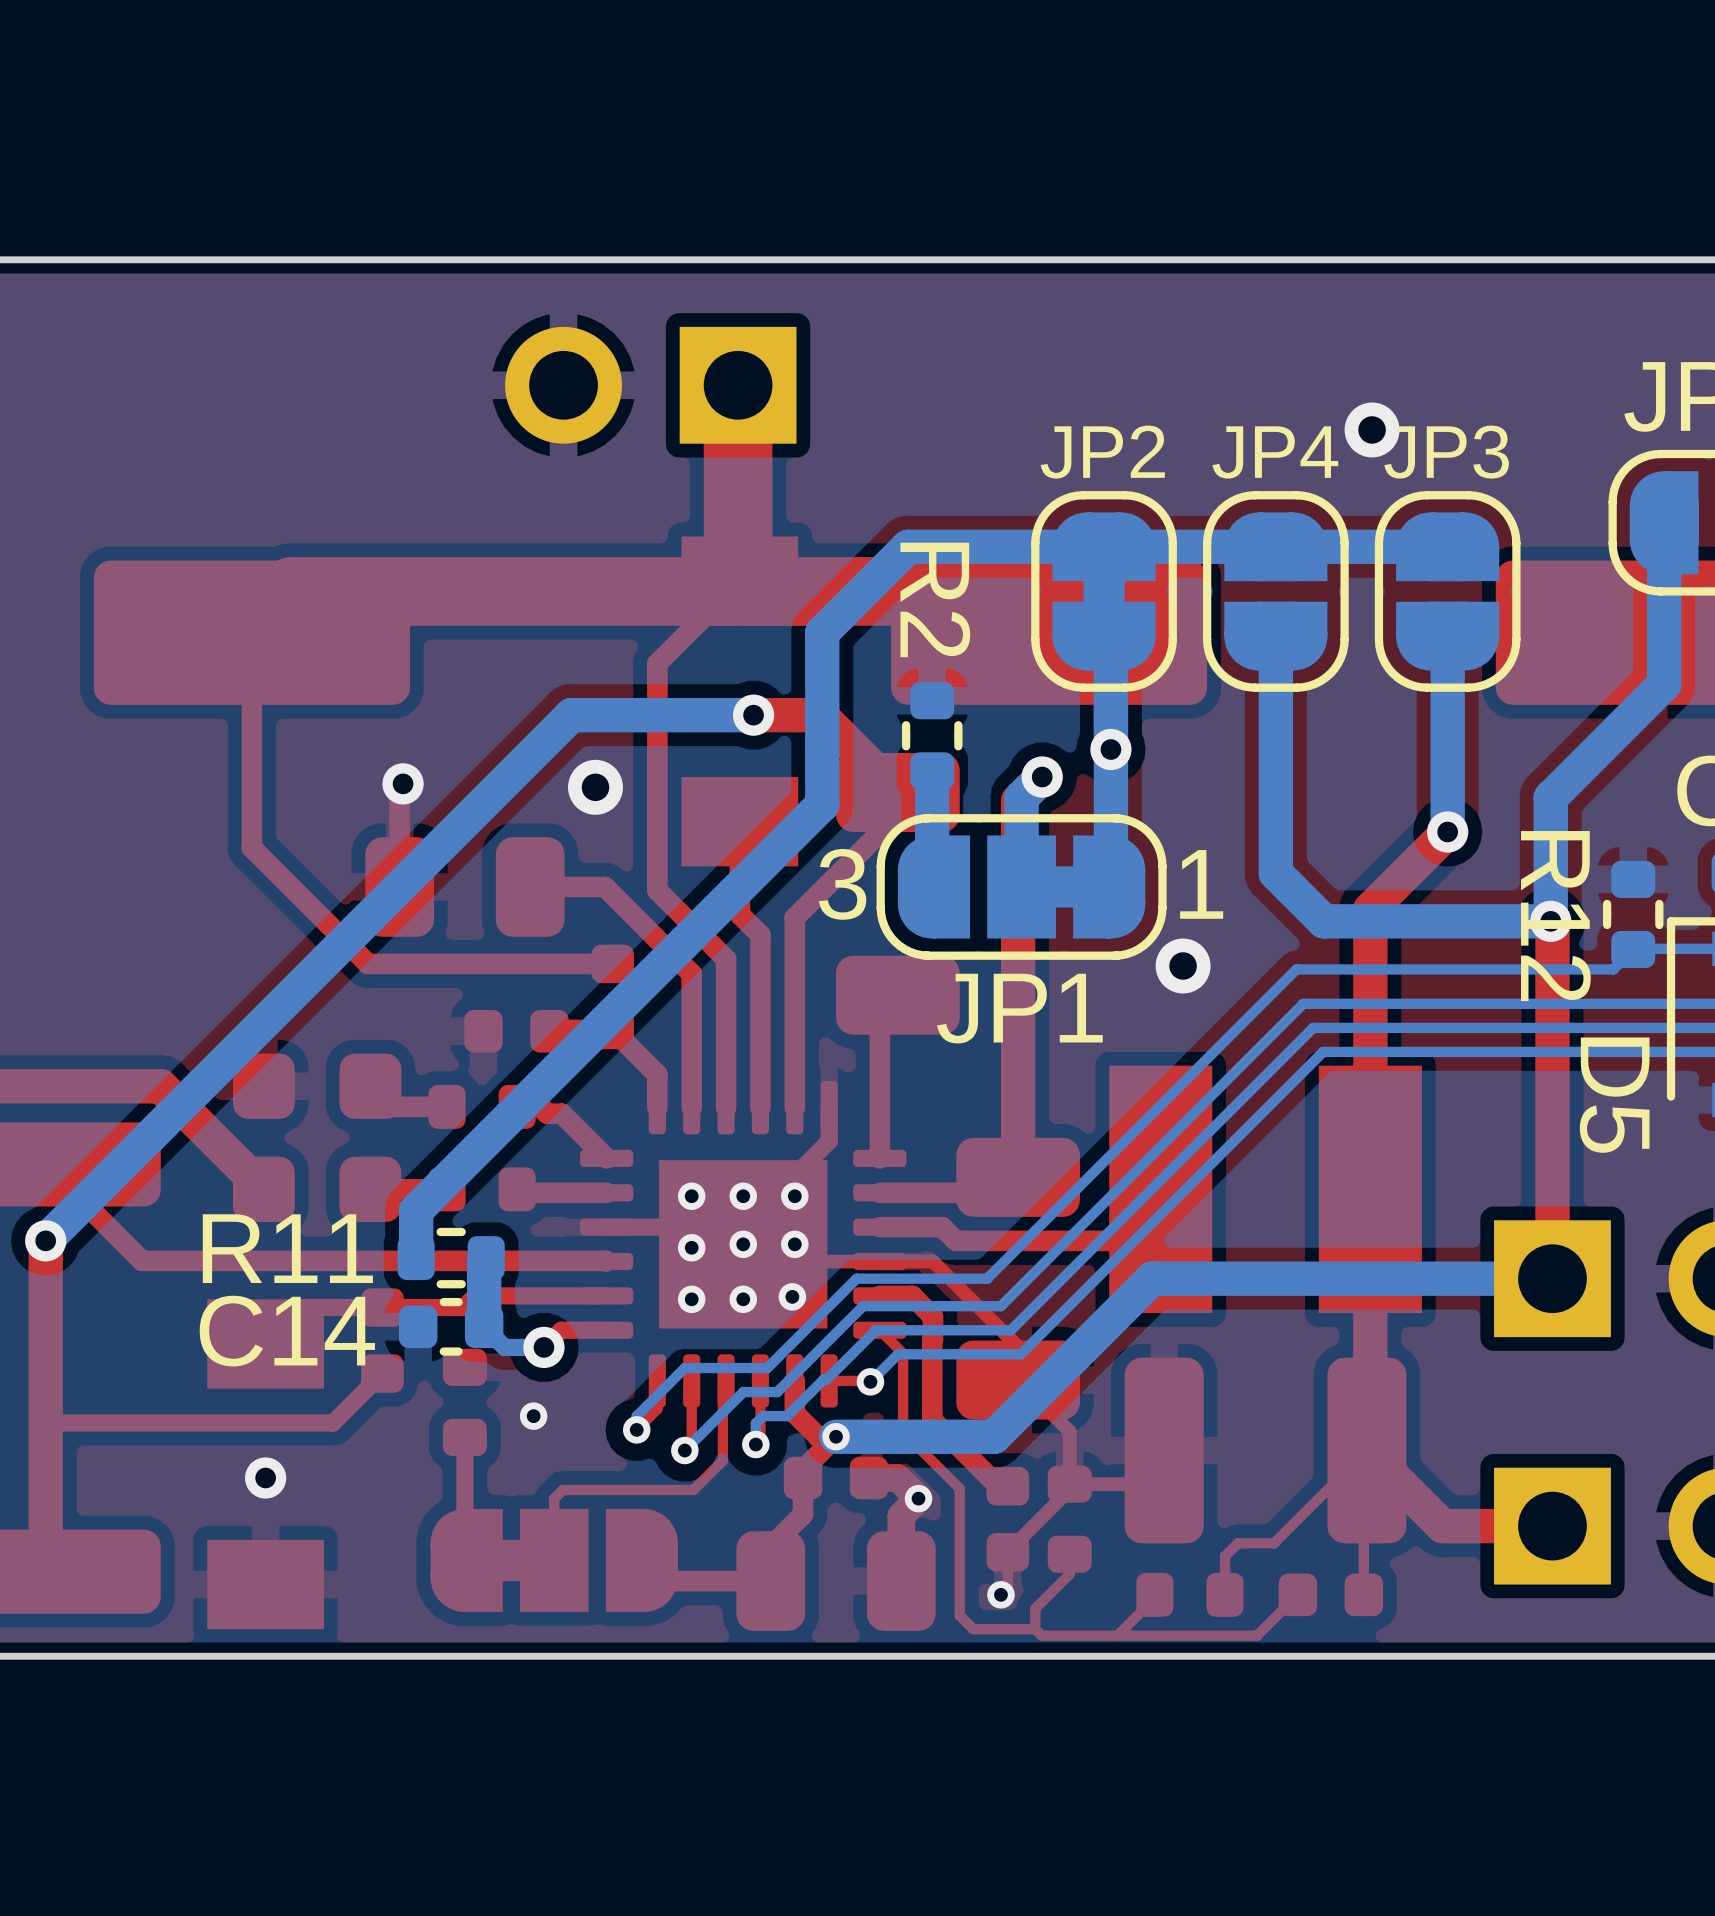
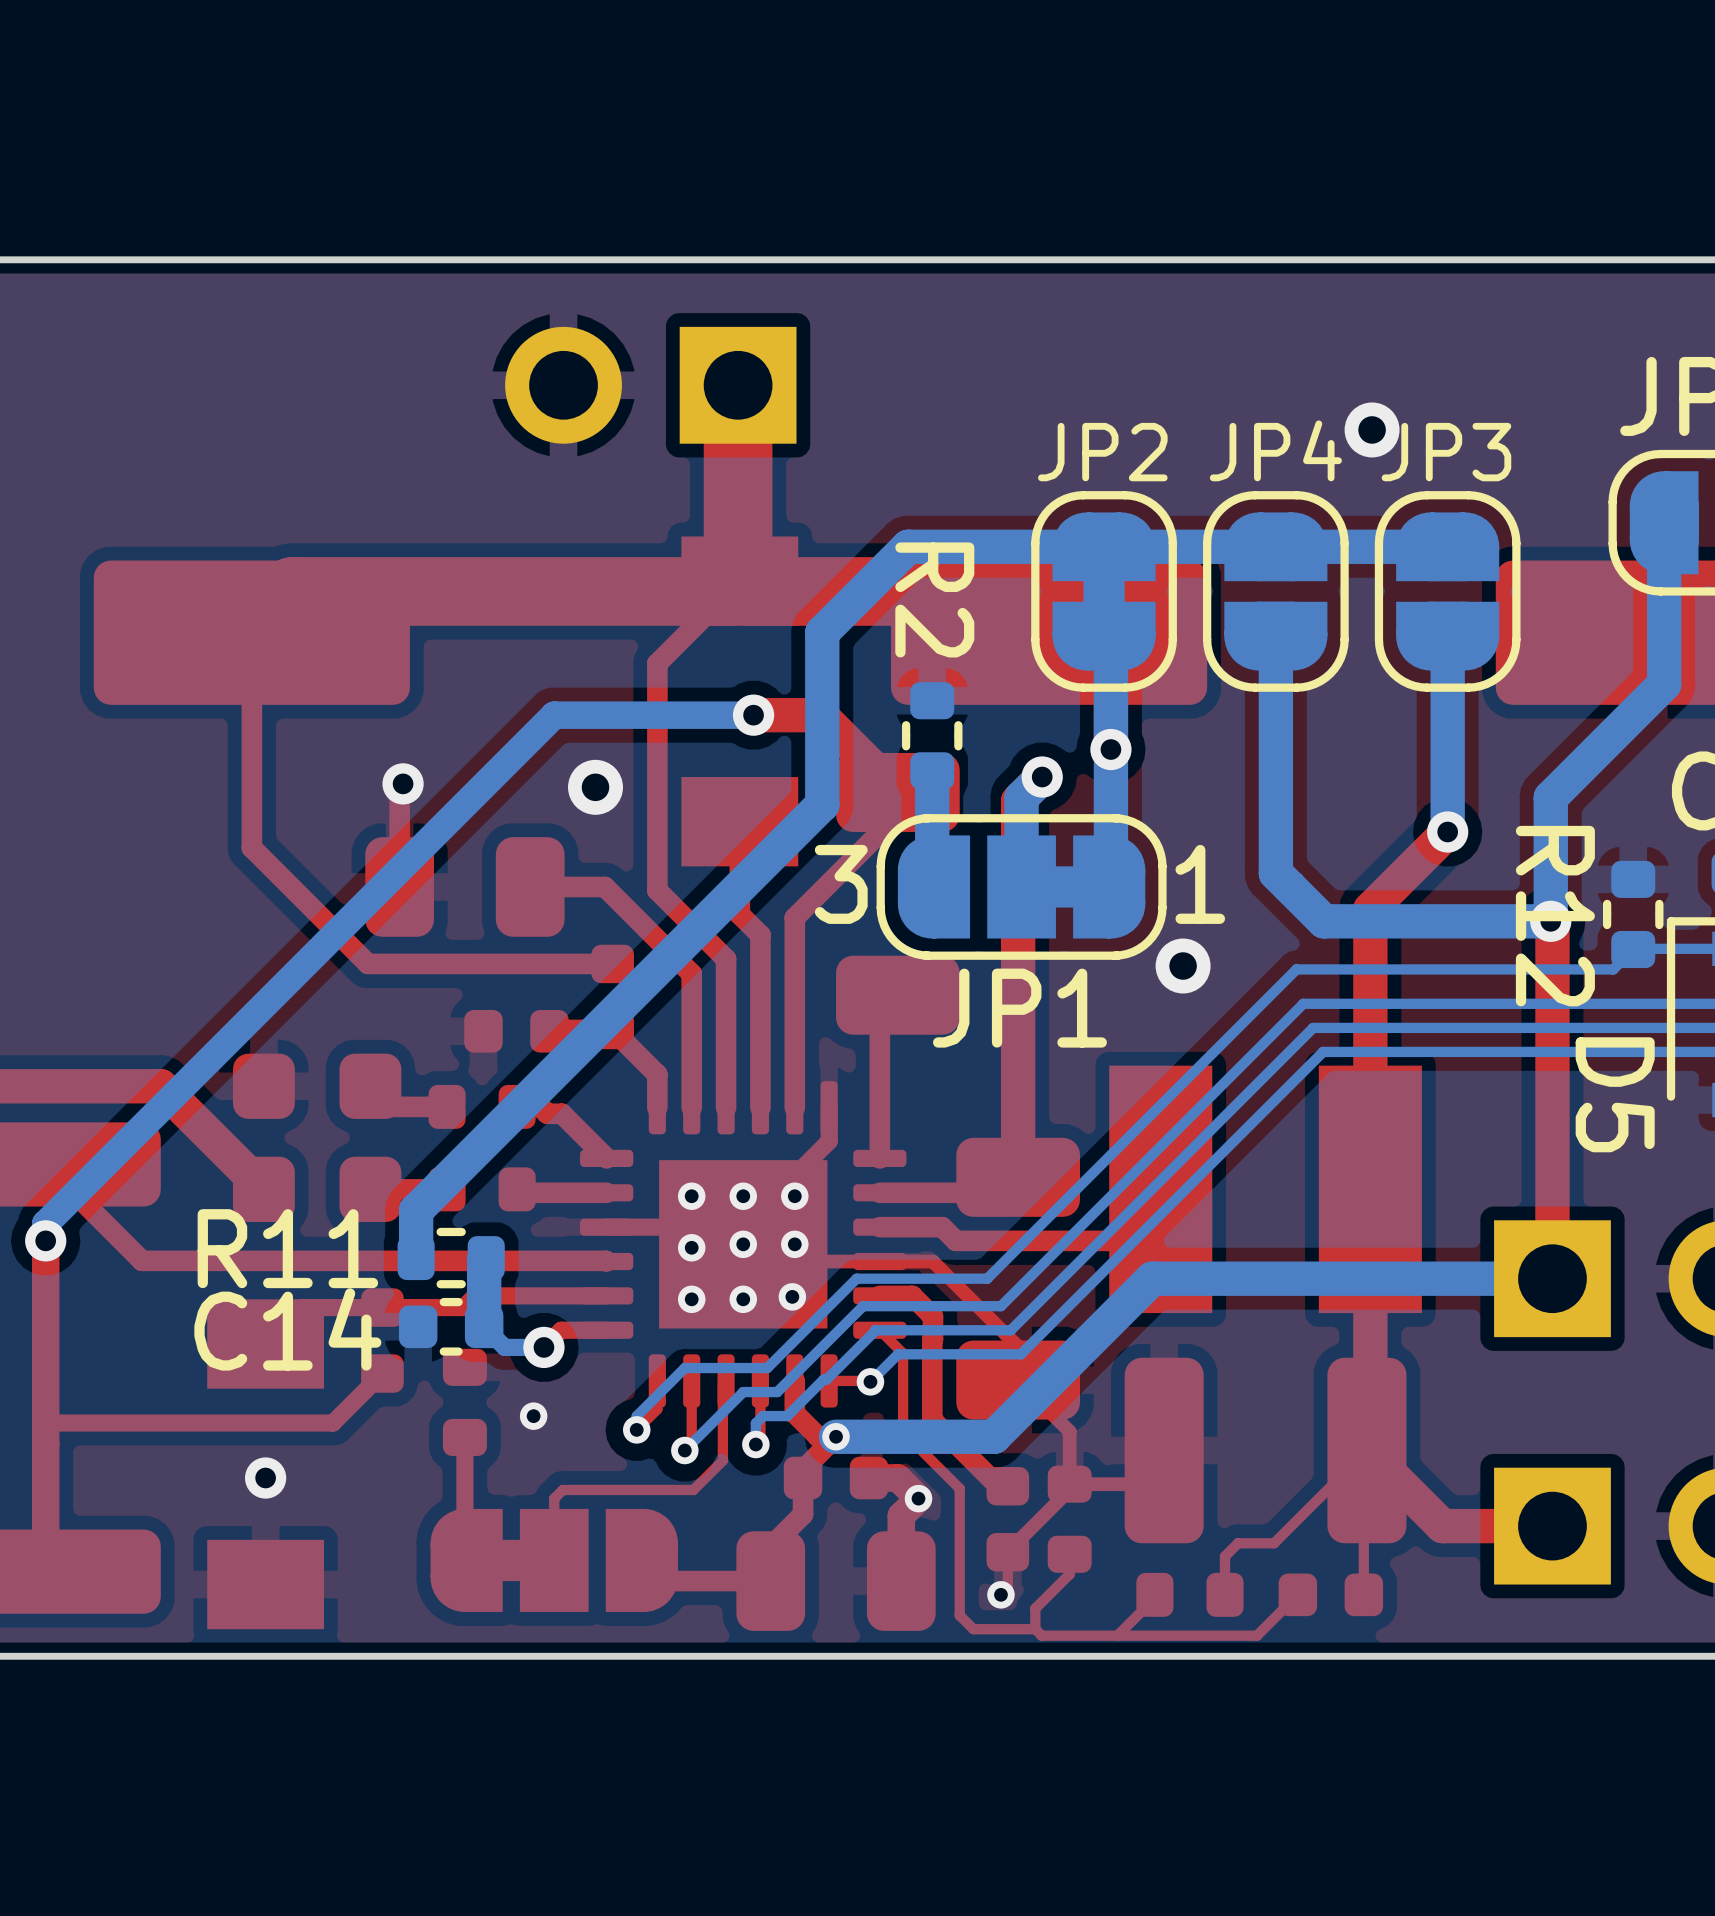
bottom track: (571, 715) (45, 1240) -> (571, 715) (554, 715) (45, 1223) (45, 1240)
bottom track width: thick (753, 715) (571, 715) -> thin (753, 715) (571, 715)
top track width: thick (45, 1240) (45, 1571) -> thin (45, 1240) (45, 1571)

